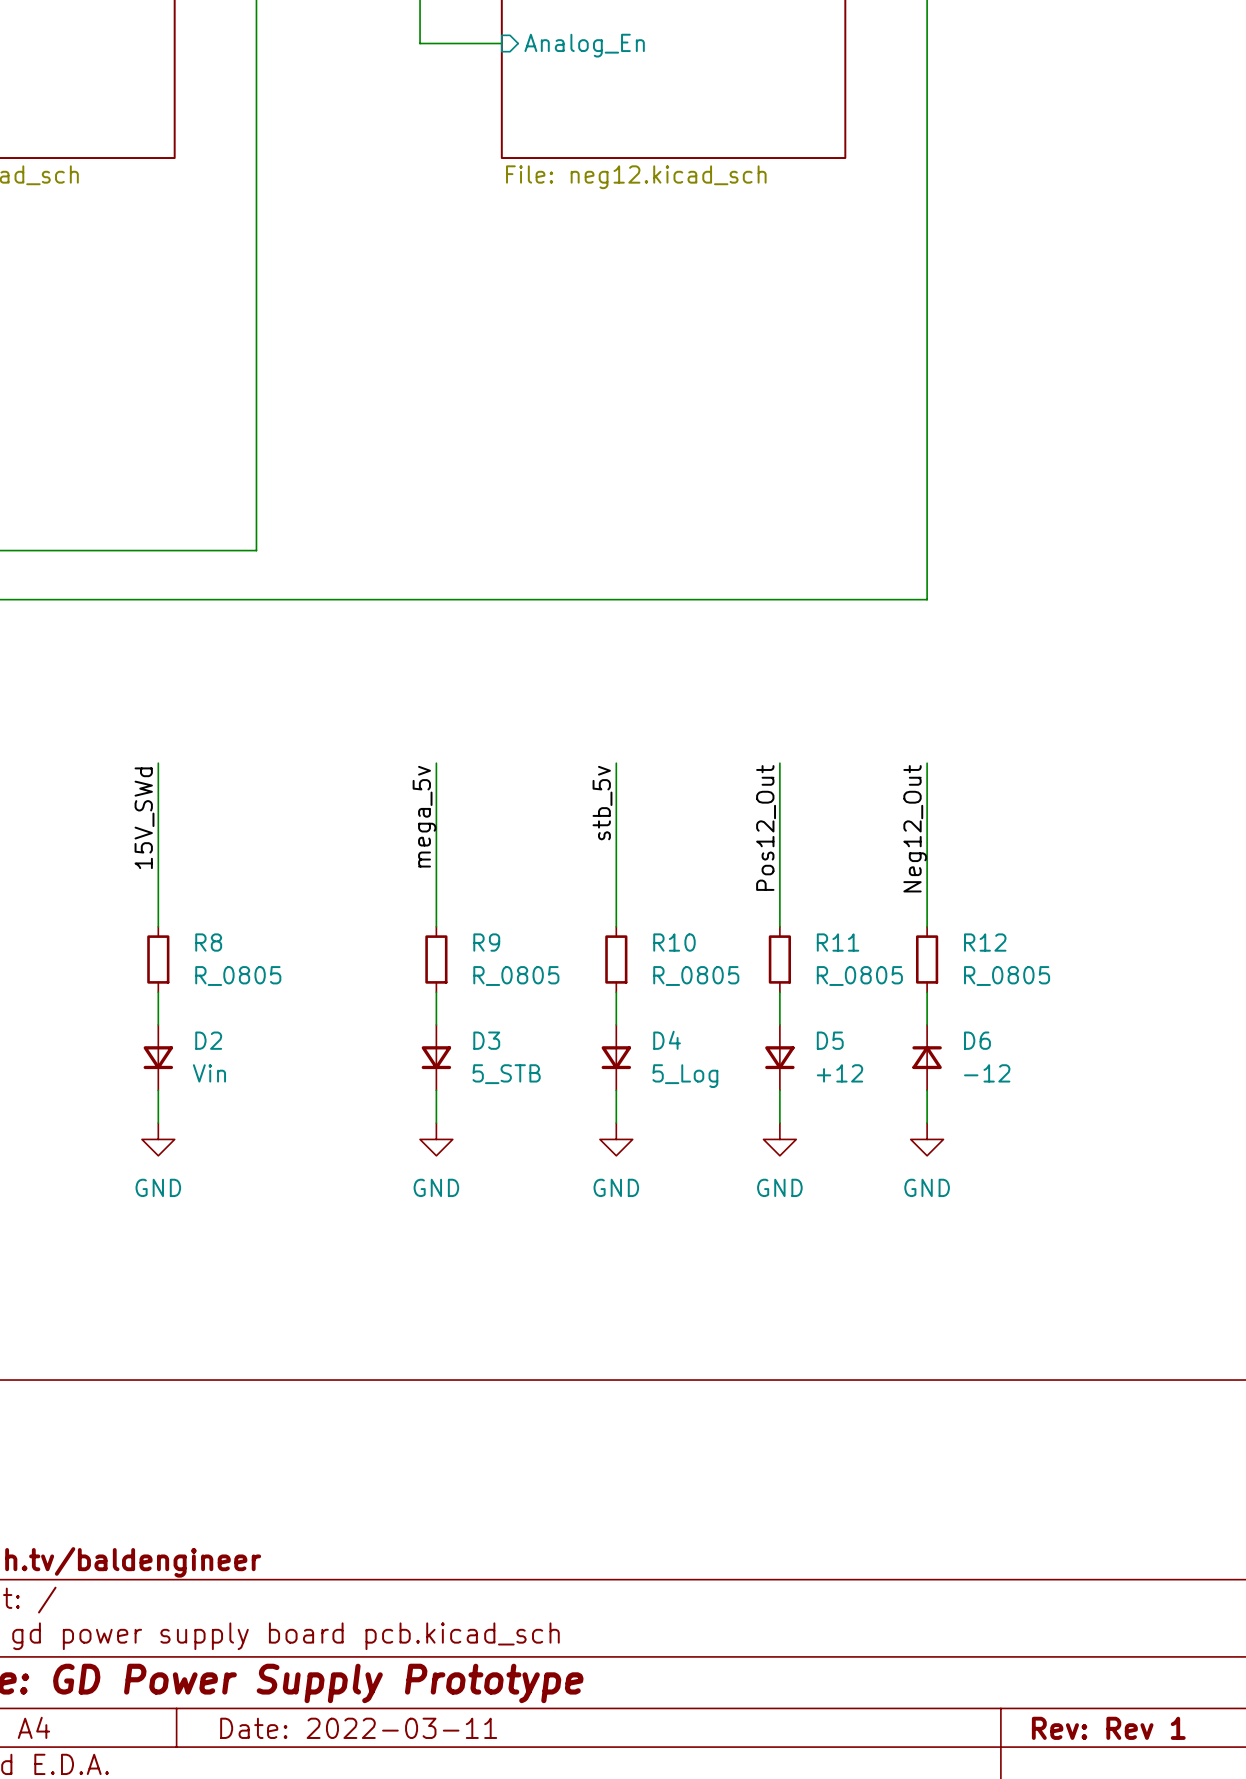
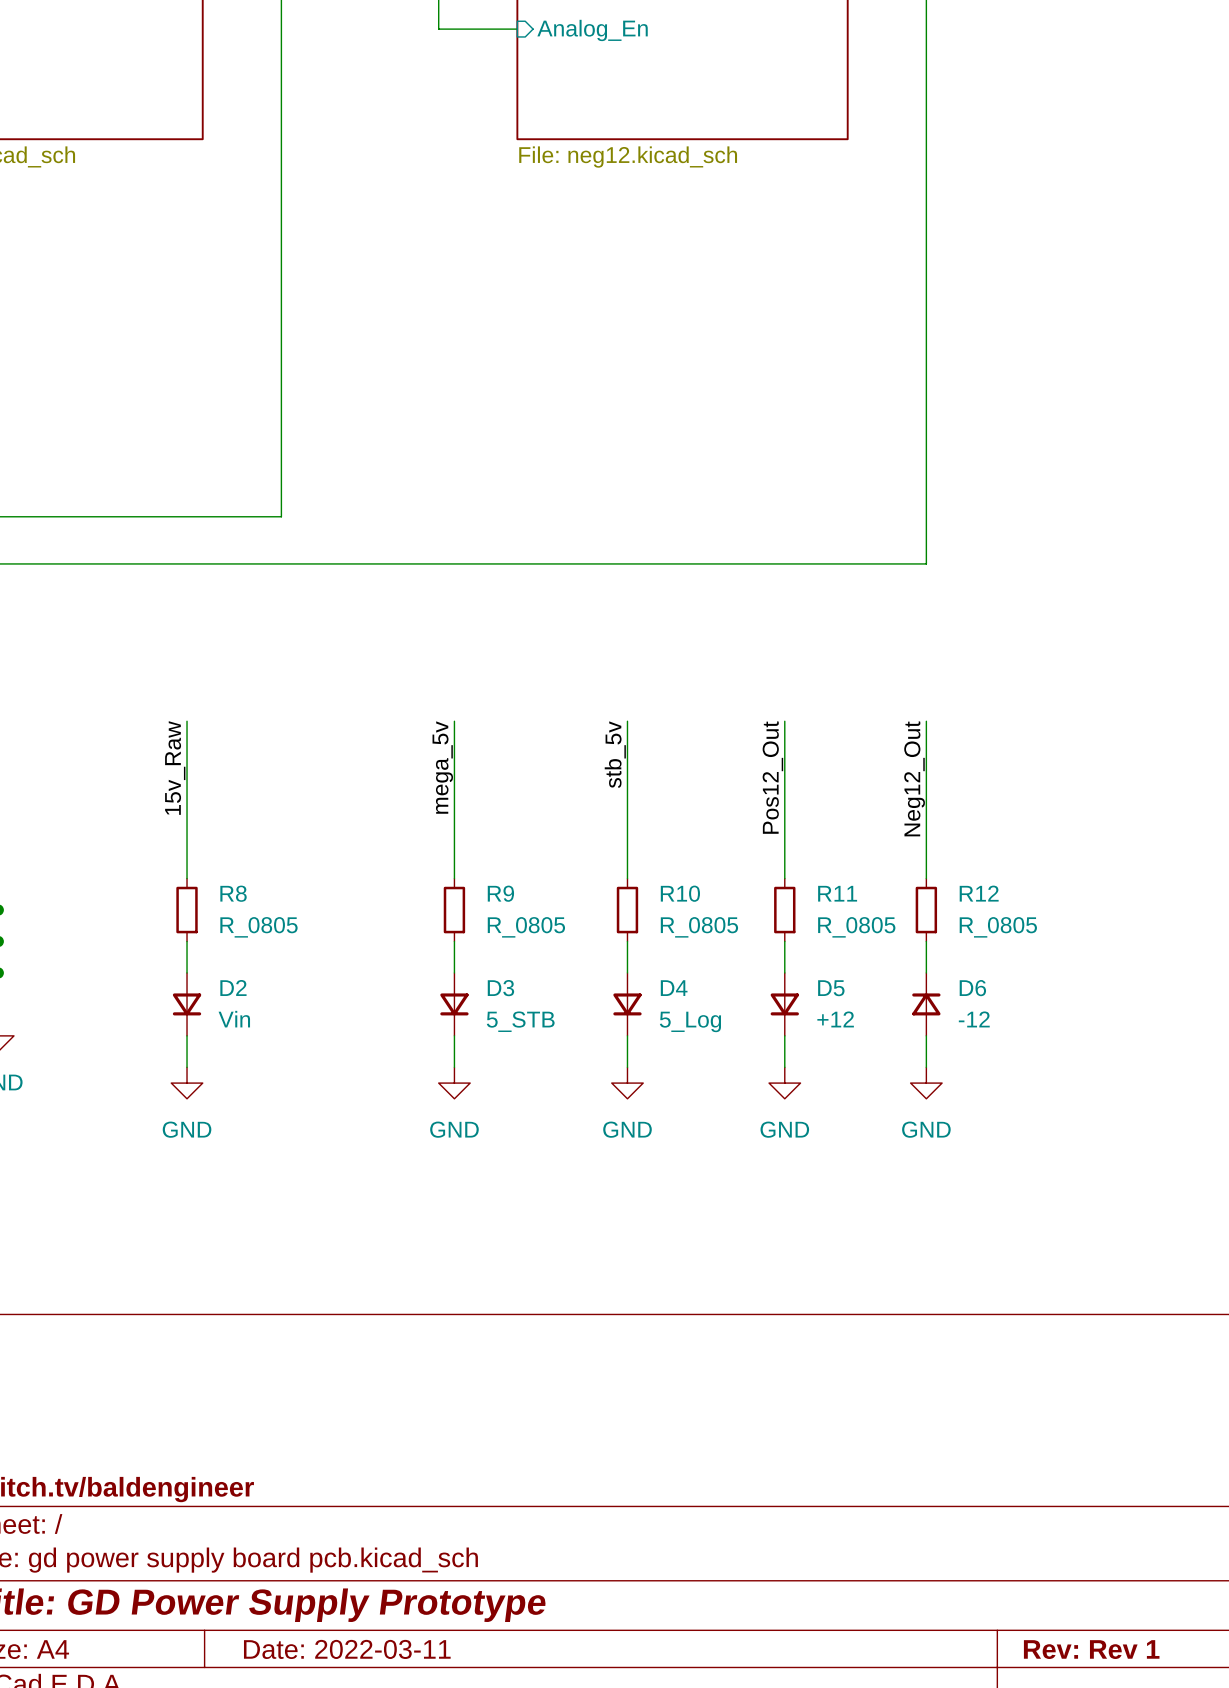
label: 15V_SWd (144, 818) -> 15v_Raw (175, 768)

